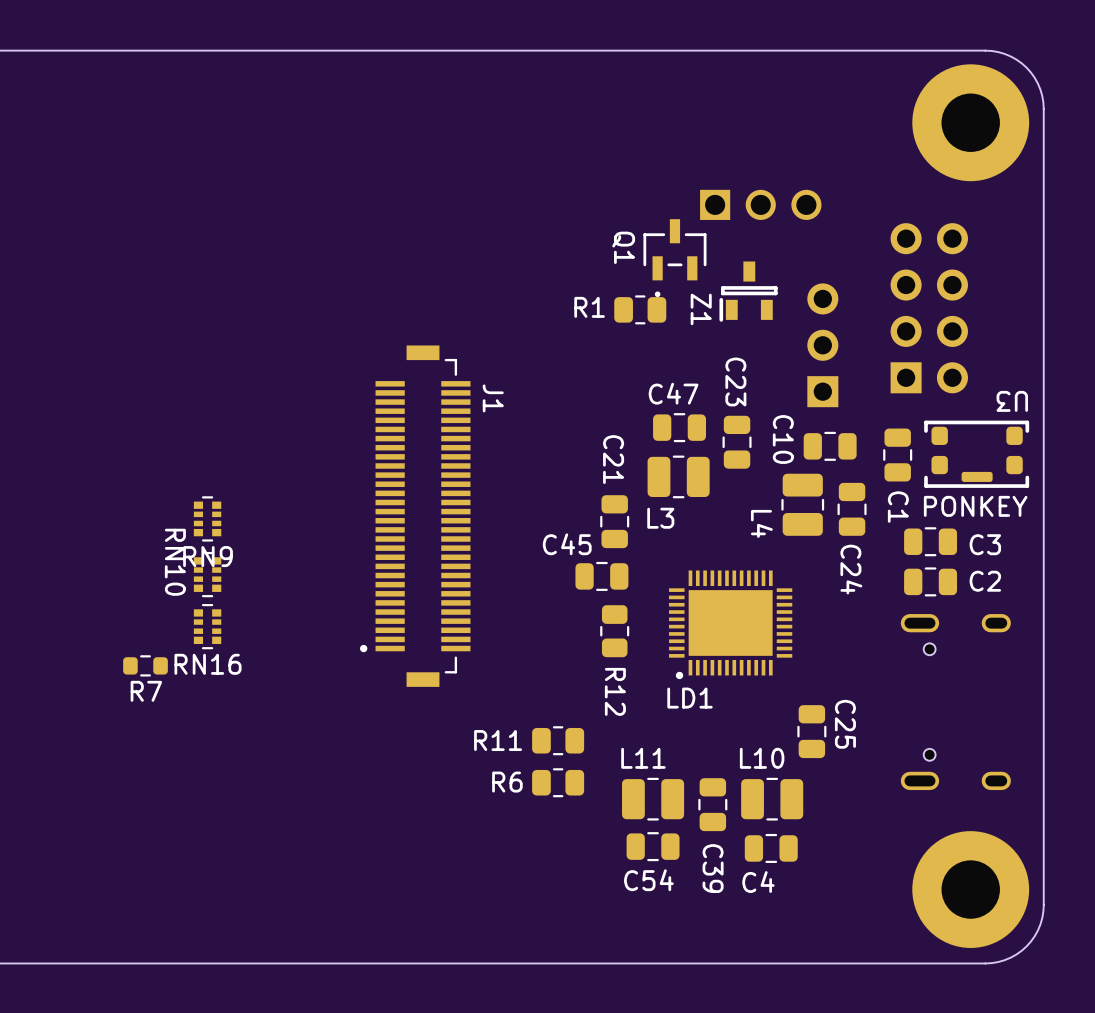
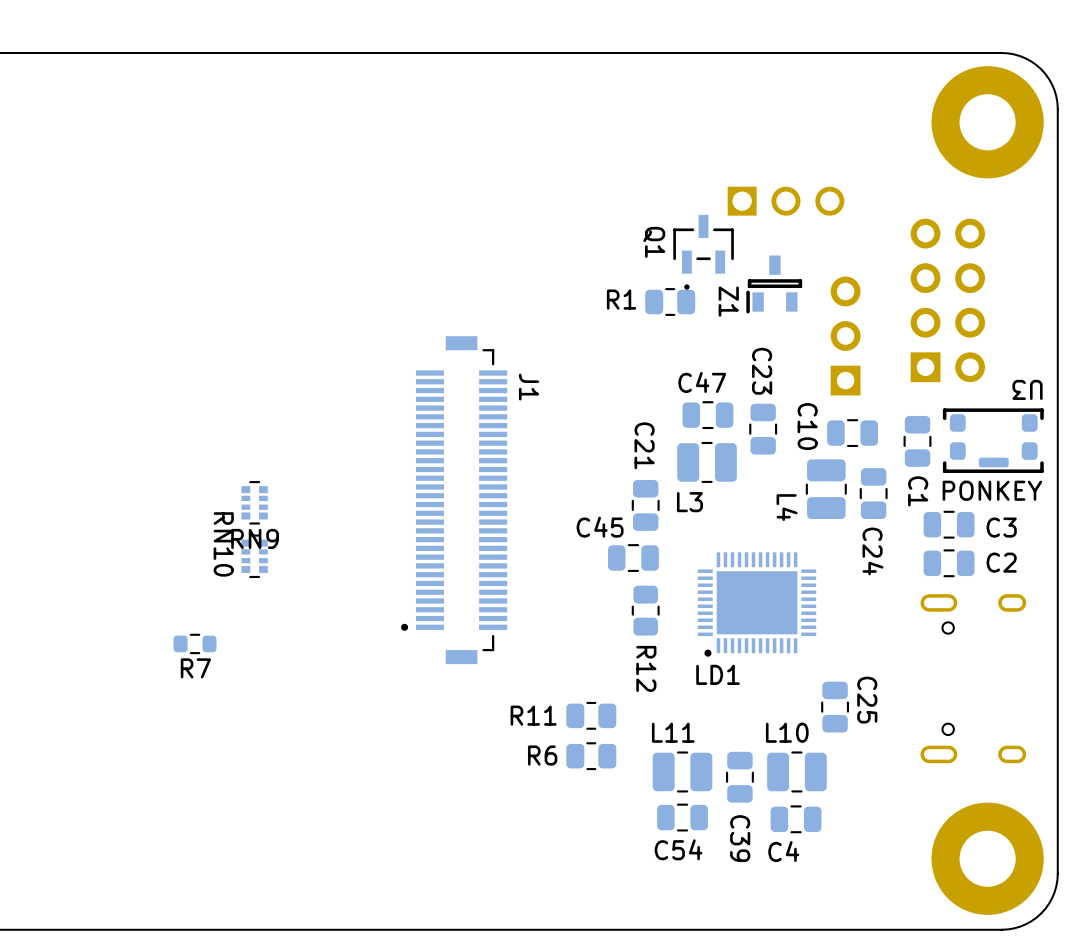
RN16: (207, 626) -> none

